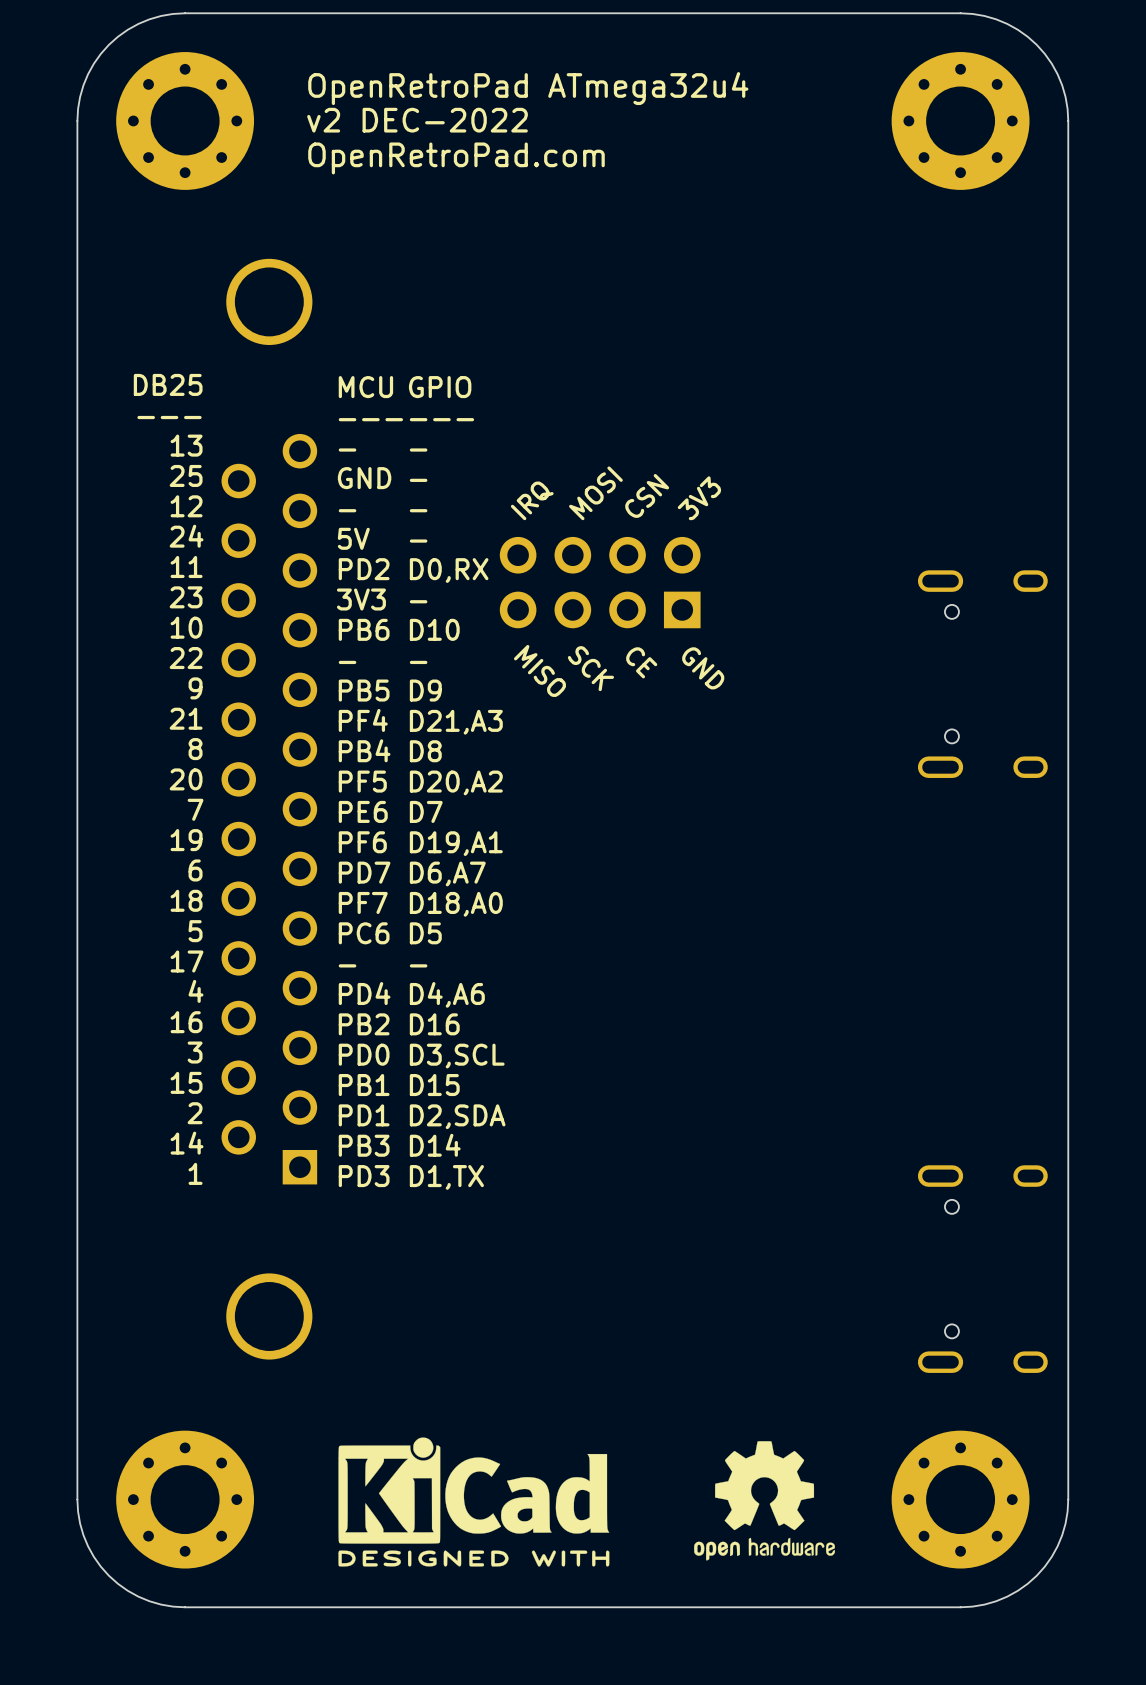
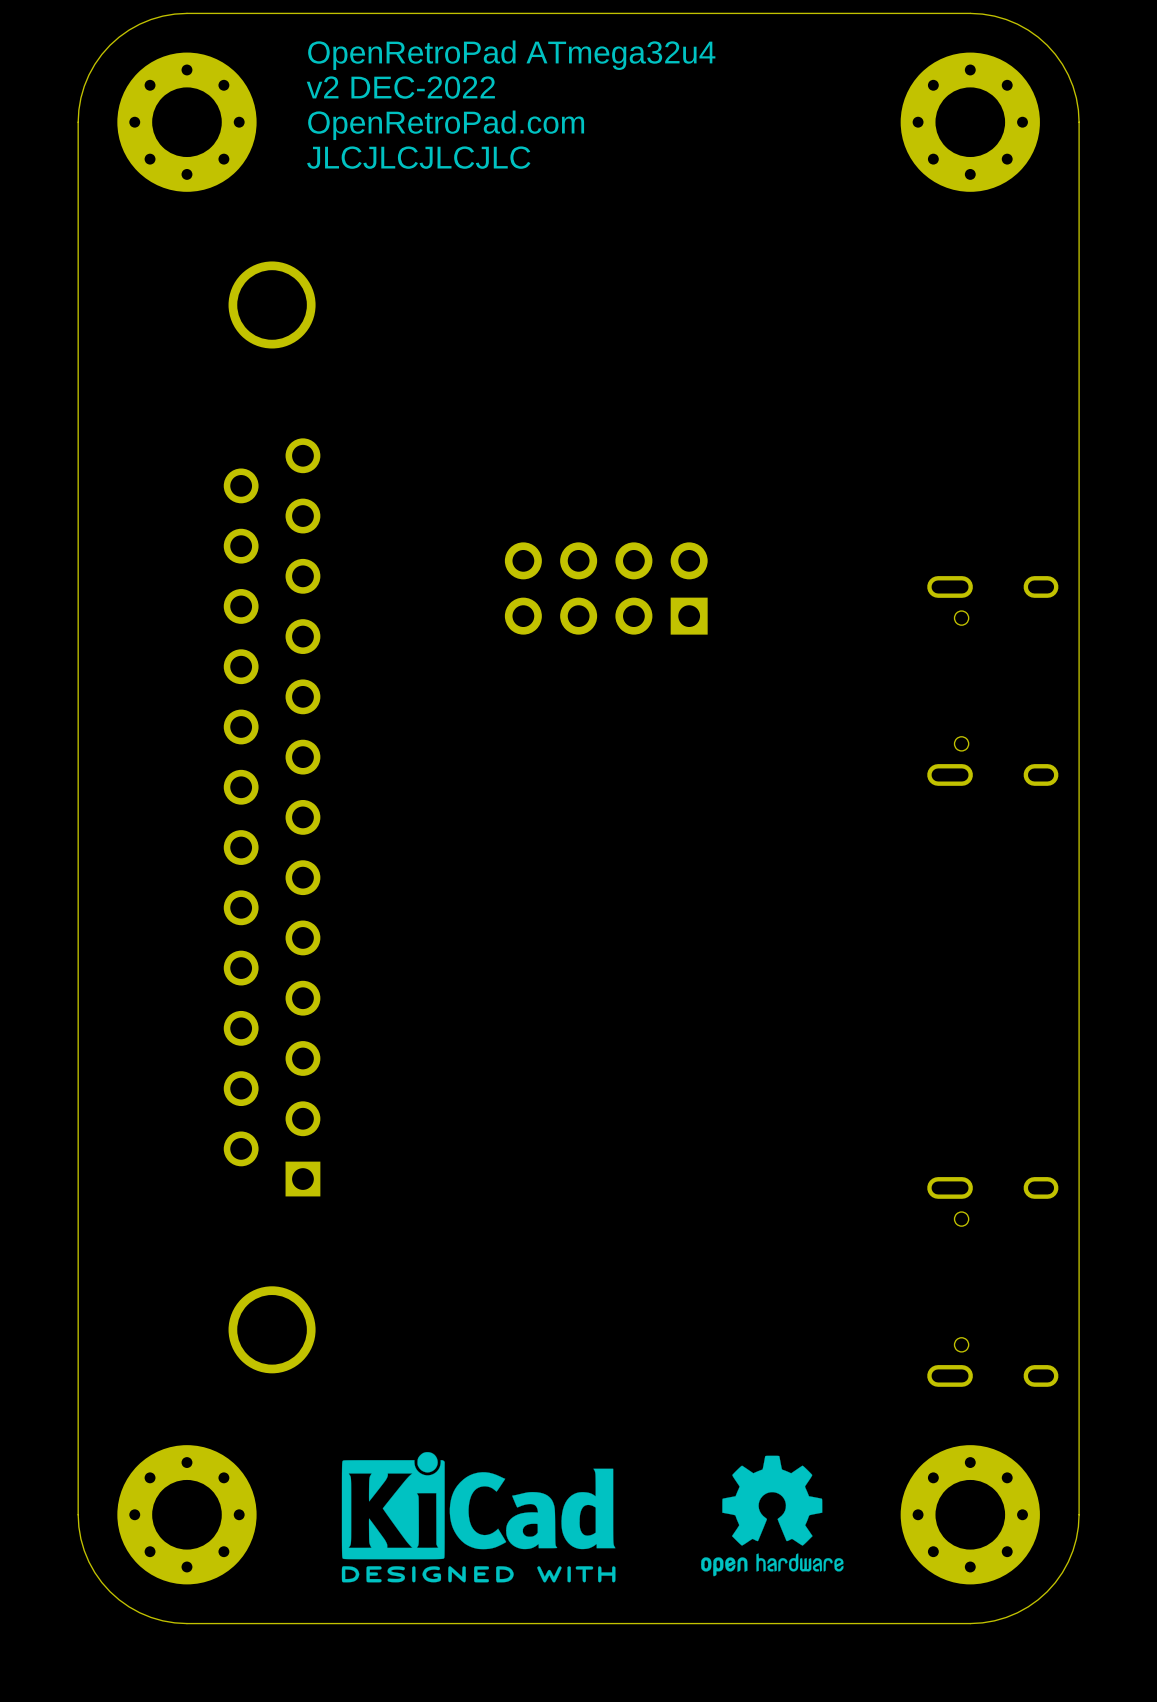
text: none -> OpenRetroPad ATmega32u4 (511, 55)
text: OpenRetroPad ATmega32u4 (528, 88) -> v2 DEC-2022 (400, 87)
text: v2 DEC-2022 (417, 120) -> OpenRetroPad.com (446, 125)
text: OpenRetroPad.com (456, 158) -> JLCJLCJLCJLC (418, 157)
text: DB25 (168, 384) -> none
text: MCU (365, 387) -> none
text: GPIO (440, 387) -> none
text: --- (169, 417) -> none
text: --- (370, 419) -> none
text: --- (441, 419) -> none
text: 13 (186, 445) -> none
text: - (347, 450) -> none
text: - (418, 450) -> none
text: 25 (186, 475) -> none
text: GND (364, 478) -> none
text: - (418, 480) -> none
text: MOSI (595, 493) -> none
text: CSN (647, 495) -> none
text: 3V3 (699, 498) -> none
text: IRQ (532, 500) -> none
text: 12 (186, 506) -> none
text: - (347, 510) -> none
text: - (418, 510) -> none
text: 24 (186, 536) -> none
text: 5V (353, 538) -> none
text: - (418, 541) -> none
text: 11 (186, 567) -> none
text: PD2 (364, 569) -> none
text: D0,RX (449, 570) -> none
text: 23 (186, 597) -> none
text: 3V3 (361, 599) -> none
text: - (418, 601) -> none
text: 10 (186, 627) -> none
text: PB6 (364, 629) -> none
text: D10 (434, 629) -> none
text: 22 (186, 658) -> none
text: - (347, 662) -> none
text: - (418, 662) -> none
text: CE (641, 662) -> none
text: SCK (590, 668) -> none
text: GND (703, 668) -> none
text: MISO (539, 670) -> none
text: 9 (195, 688) -> none
text: PB5 (364, 690) -> none
text: D9 (425, 690) -> none
text: 21 (186, 718) -> none
text: PF4 (363, 720) -> none
text: D21,A3 (456, 722) -> none
text: 8 (195, 749) -> none
text: PB4 (364, 750) -> none
text: D8 (425, 751) -> none
text: 20 (186, 779) -> none
text: PF5 (362, 781) -> none
text: D20,A2 (456, 782) -> none
text: 7 (195, 809) -> none
text: PE6 (363, 811) -> none
text: D7 (426, 811) -> none
text: 19 (186, 840) -> none
text: PF6 (362, 842) -> none
text: D19,A1 (456, 843) -> none
text: 6 (195, 870) -> none
text: PD7 (364, 872) -> none
text: D6,A7 (447, 873) -> none
text: 18 (186, 900) -> none
text: PF7 (363, 902) -> none
text: D18,A0 (456, 904) -> none
text: 5 (195, 931) -> none
text: PC6 (364, 933) -> none
text: D5 (425, 933) -> none
text: 17 (187, 961) -> none
text: - (347, 965) -> none
text: - (418, 965) -> none
text: 4 (195, 991) -> none
text: PD4 (364, 993) -> none
text: D4,A6 (447, 994) -> none
text: 16 (186, 1022) -> none
text: PB2 (364, 1024) -> none
text: D16 (434, 1024) -> none
text: 3 (195, 1052) -> none
text: PD0 (364, 1054) -> none
text: D3,SCL (457, 1056) -> none
text: 15 (186, 1082) -> none
text: PB1 (364, 1085) -> none
text: D15 (434, 1085) -> none
text: 2 (195, 1113) -> none
text: PD1 (364, 1115) -> none
text: D2,SDA (457, 1116) -> none
text: 14 (187, 1143) -> none
text: PB3 (364, 1145) -> none
text: D14 (435, 1145) -> none
text: 1 (195, 1173) -> none
text: PD3 (364, 1176) -> none
text: D1,TX (446, 1177) -> none

